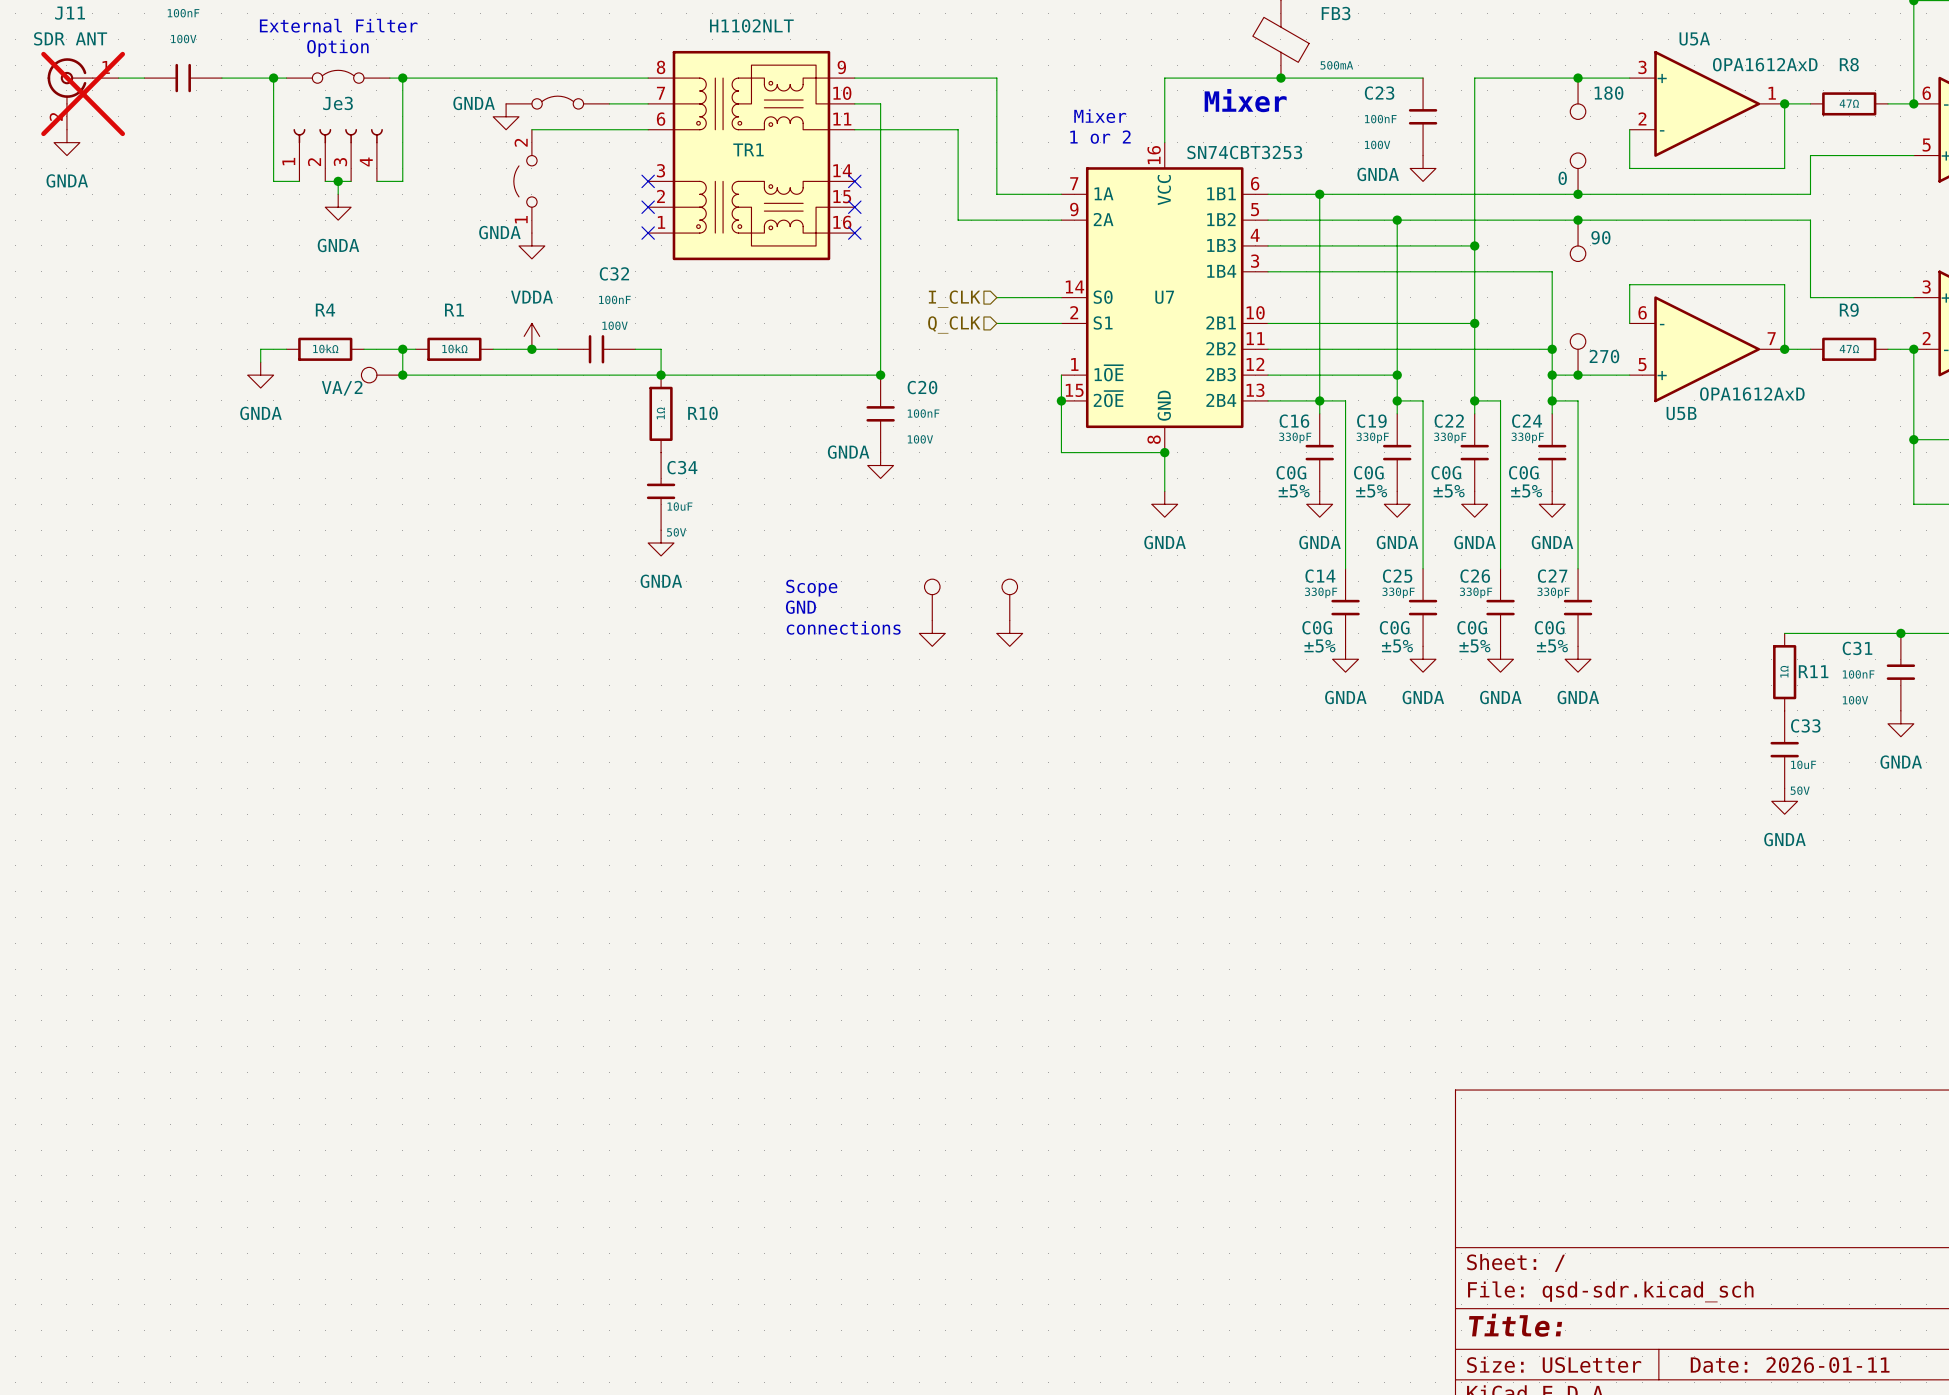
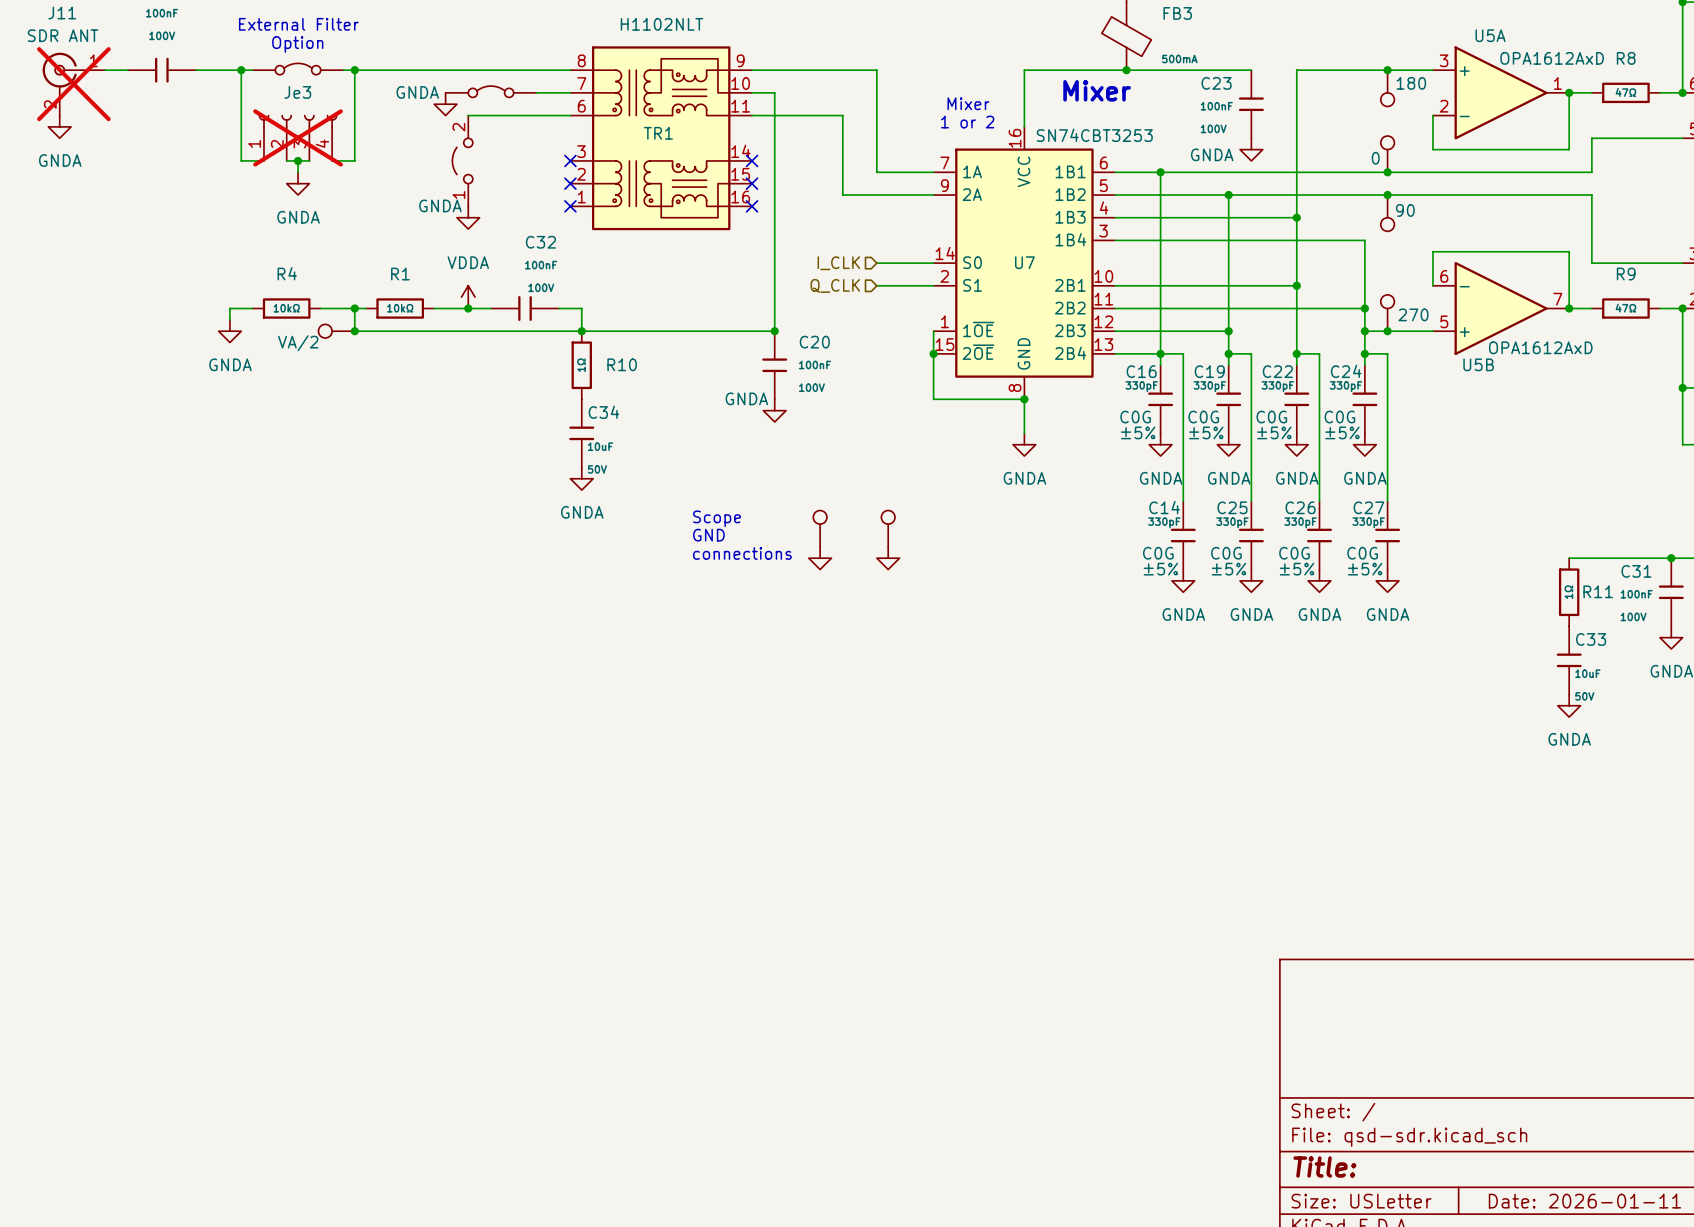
Je3 do-not-place cross: none -> (298, 137)

